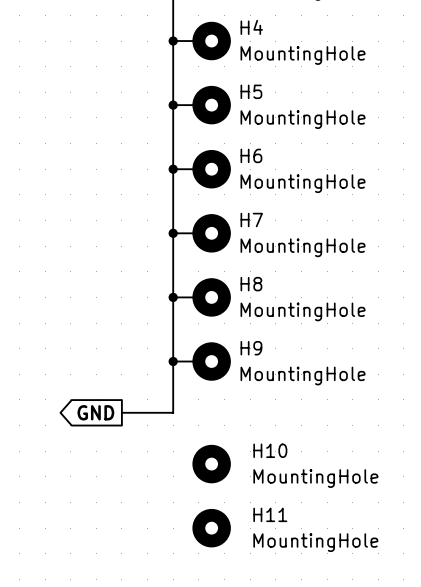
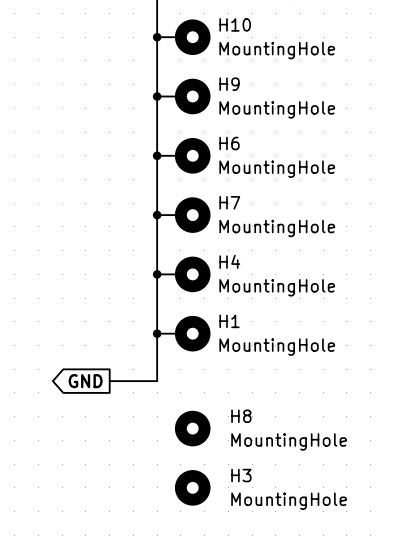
H4 name: H4 (251, 27) -> H10 (235, 24)
H5 name: H5 (251, 91) -> H9 (229, 84)
H8 name: H8 (251, 284) -> H4 (229, 261)
H9 name: H9 (251, 348) -> H1 (229, 321)
H10 name: H10 (270, 450) -> H8 (241, 416)
H11 name: H11 (270, 514) -> H3 (241, 475)

